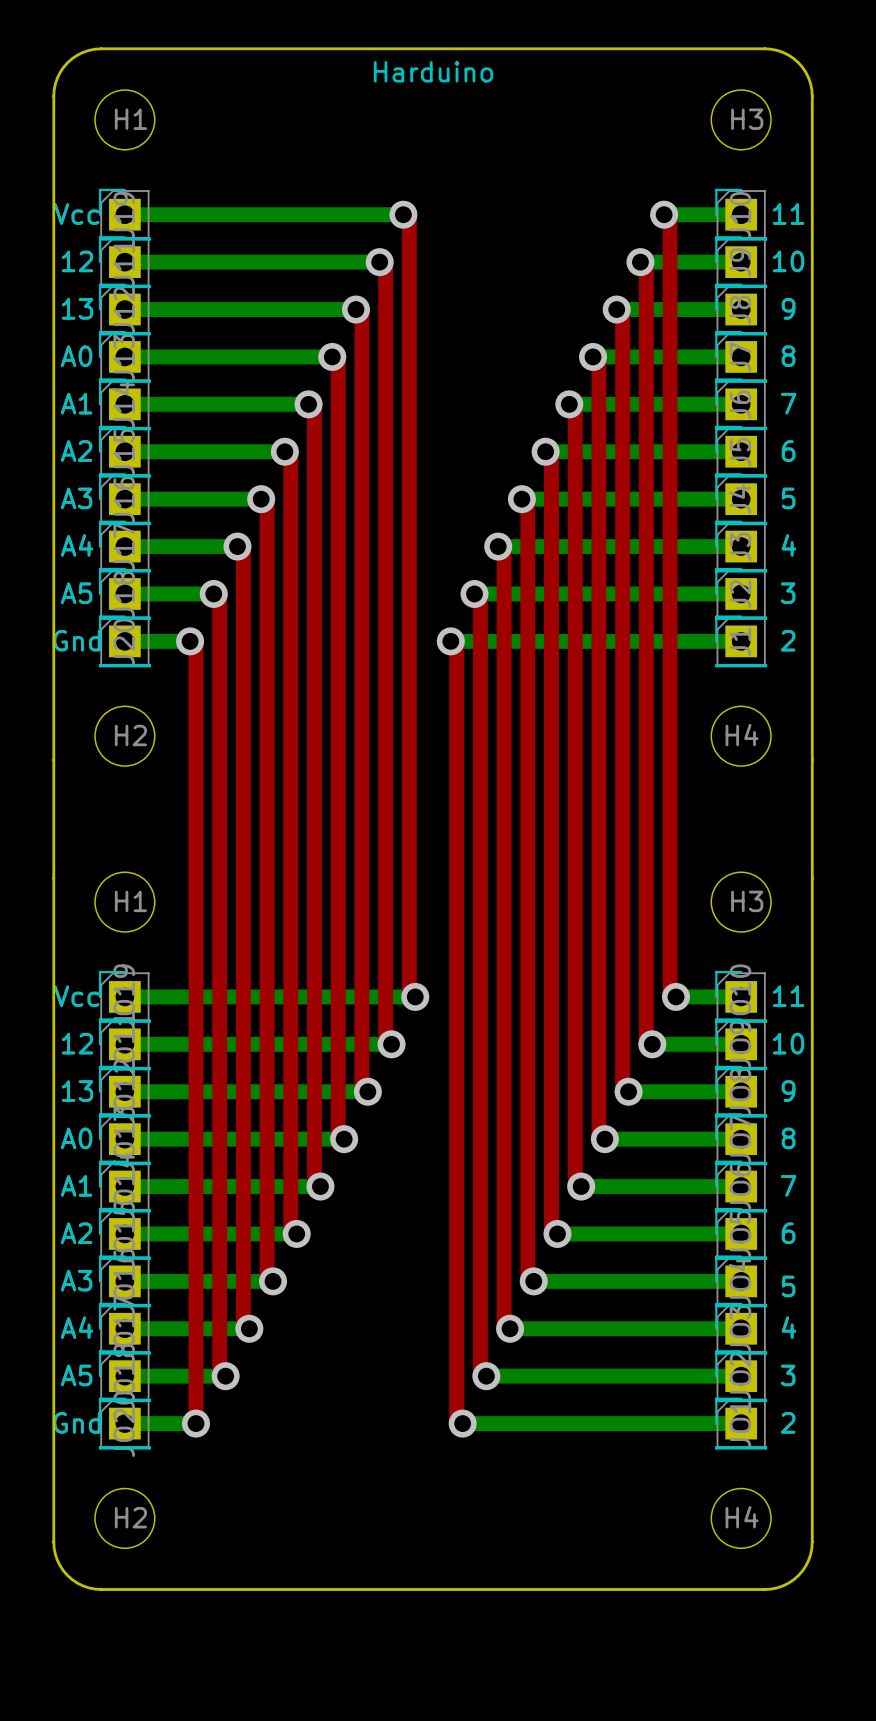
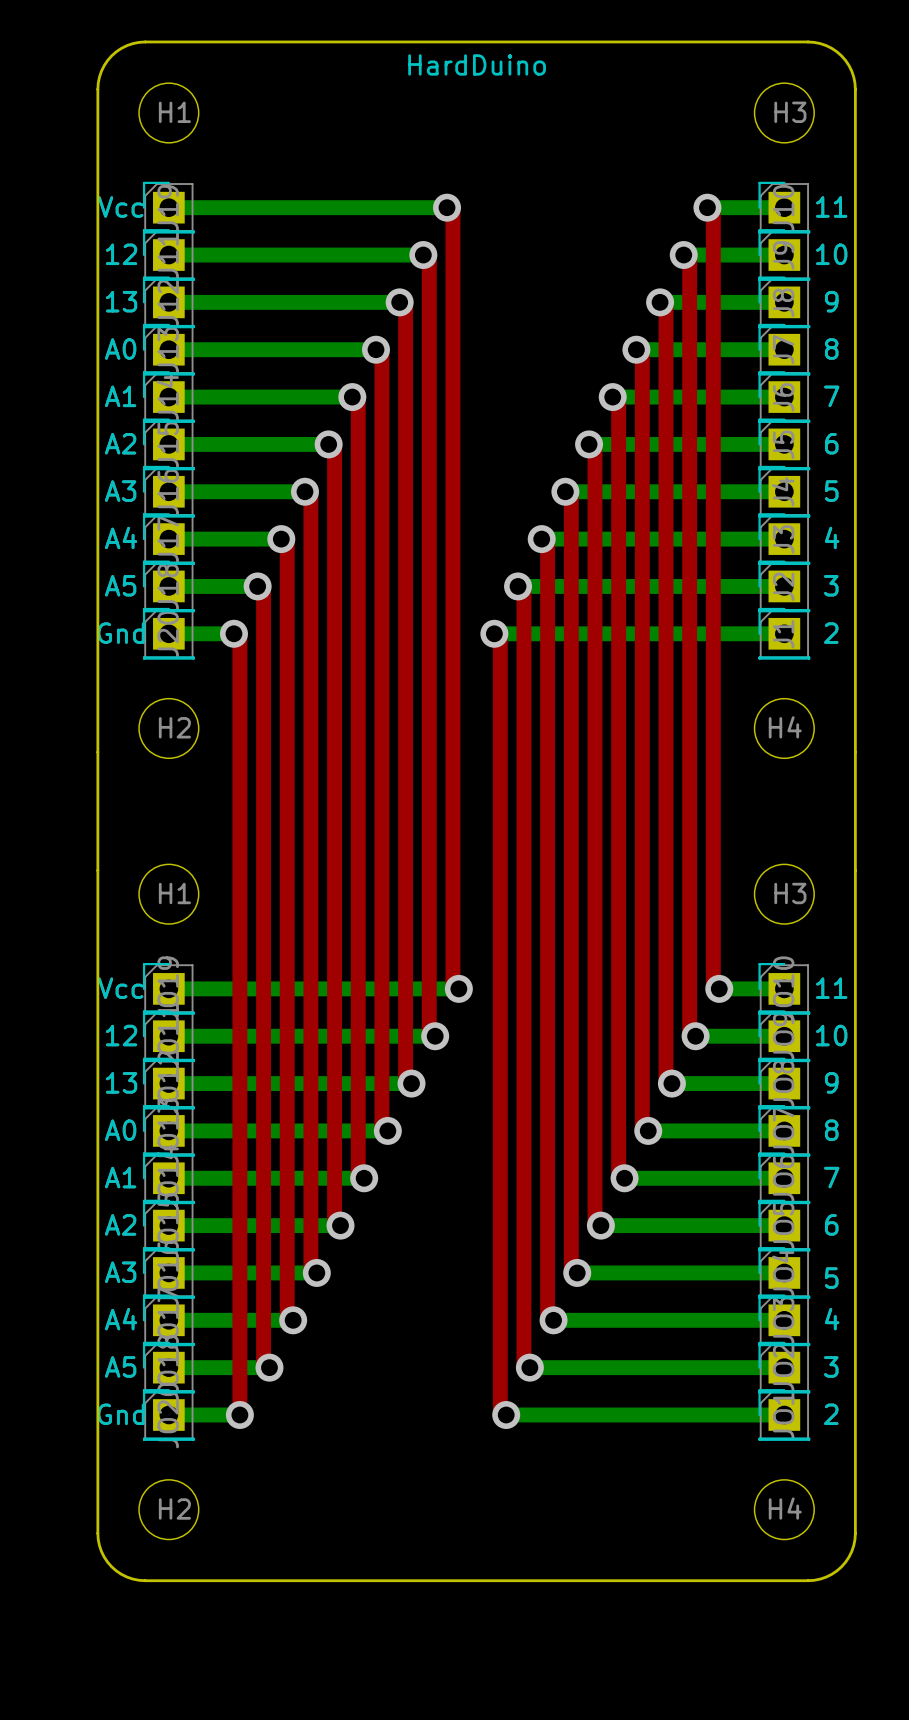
text: Harduino (433, 71) -> HardDuino (477, 64)

